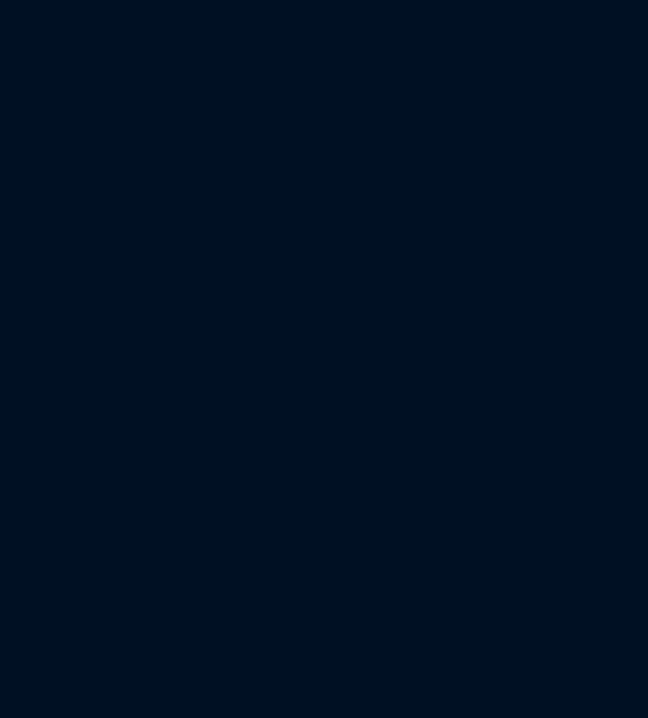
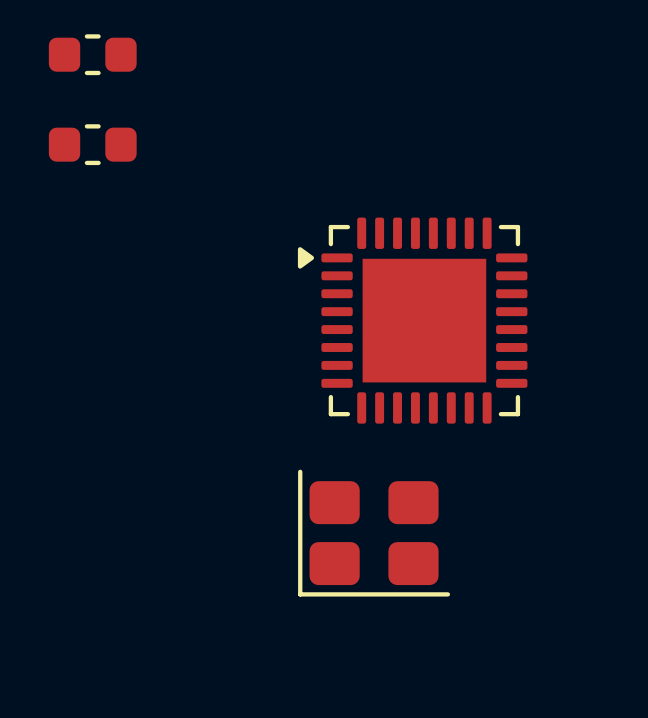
part: none -> (92, 54)
part: none -> (92, 144)
part: none -> (412, 320)
part: none -> (374, 533)

